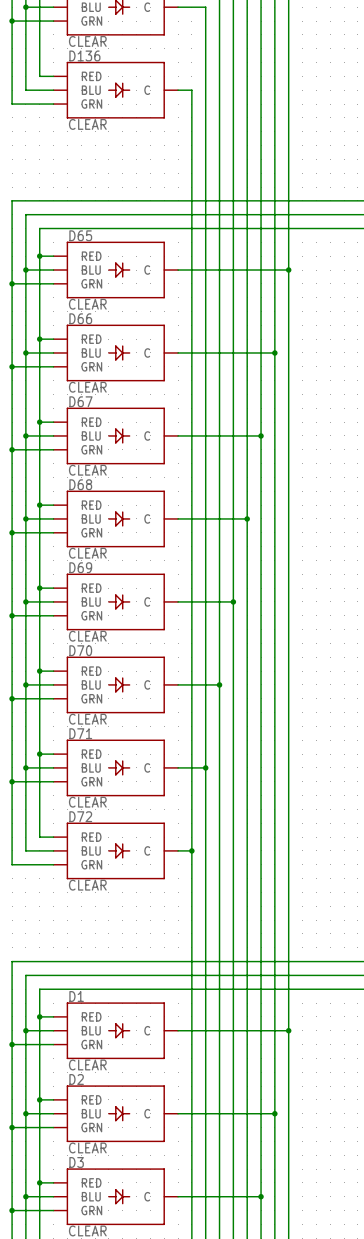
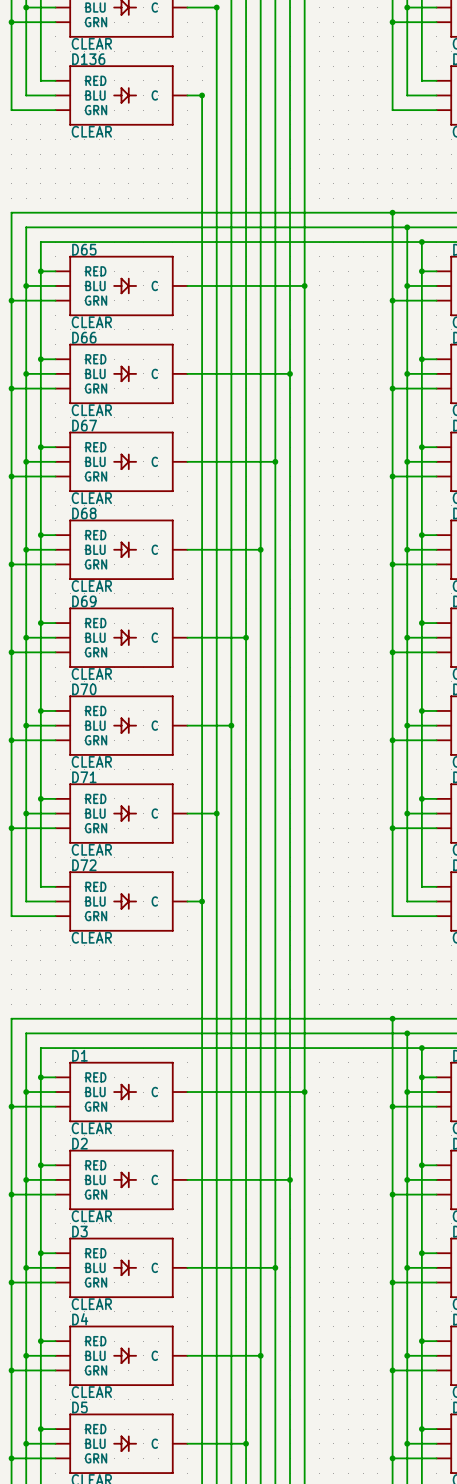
junction: none -> (216, 7)
junction: none -> (202, 95)

